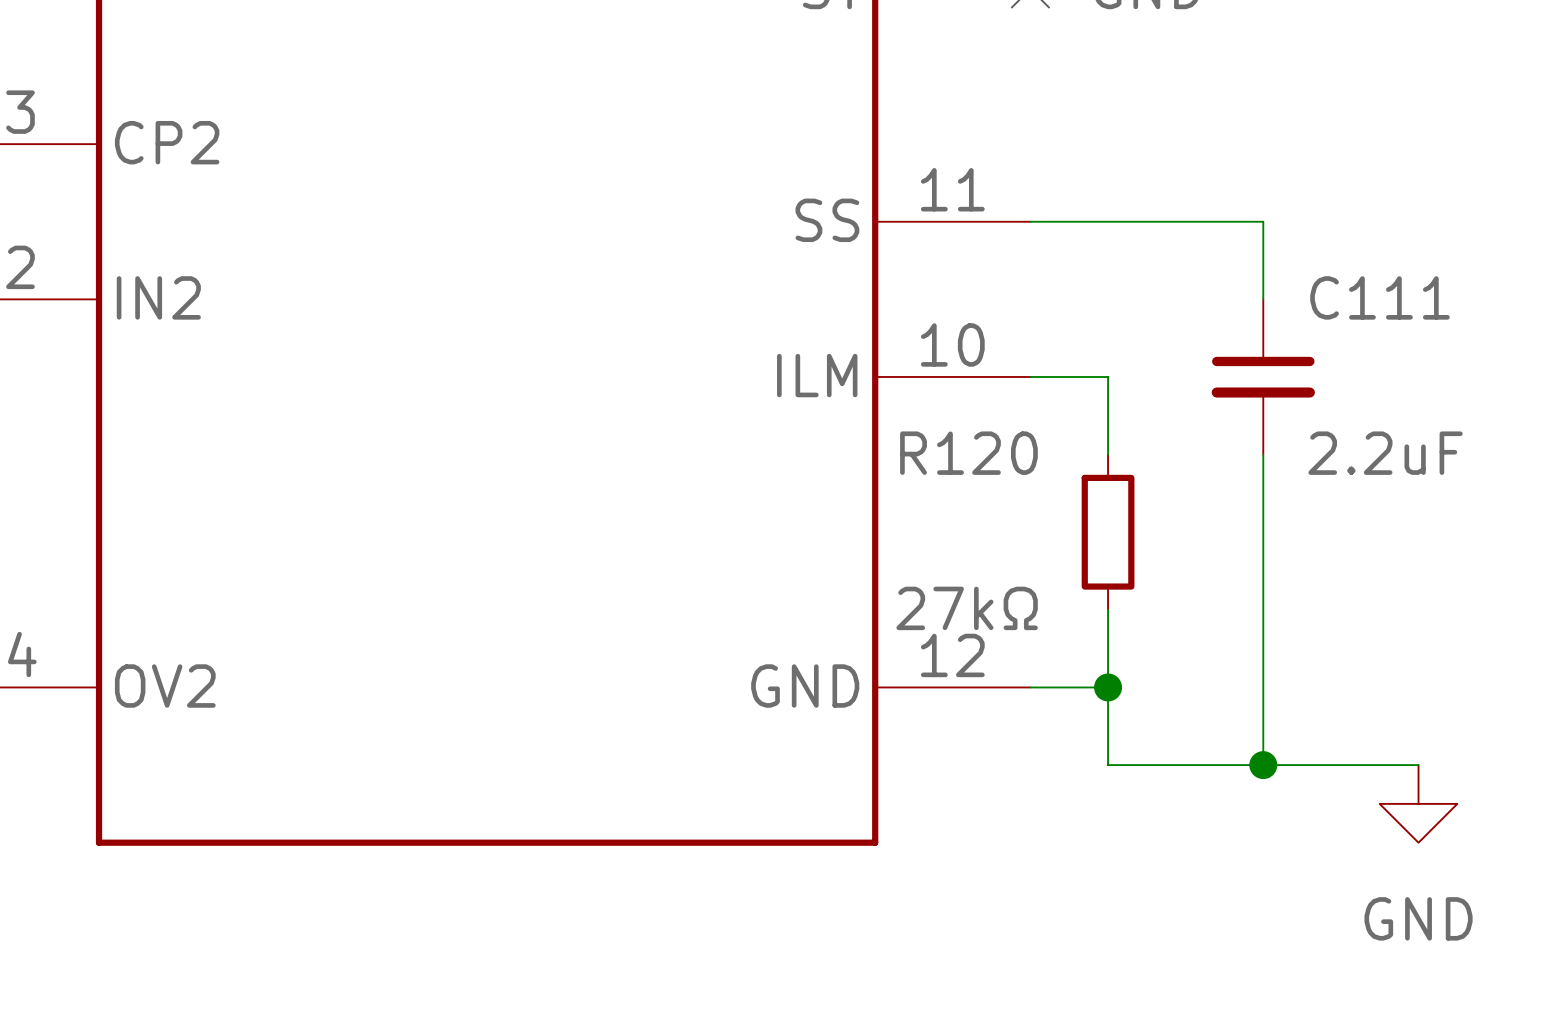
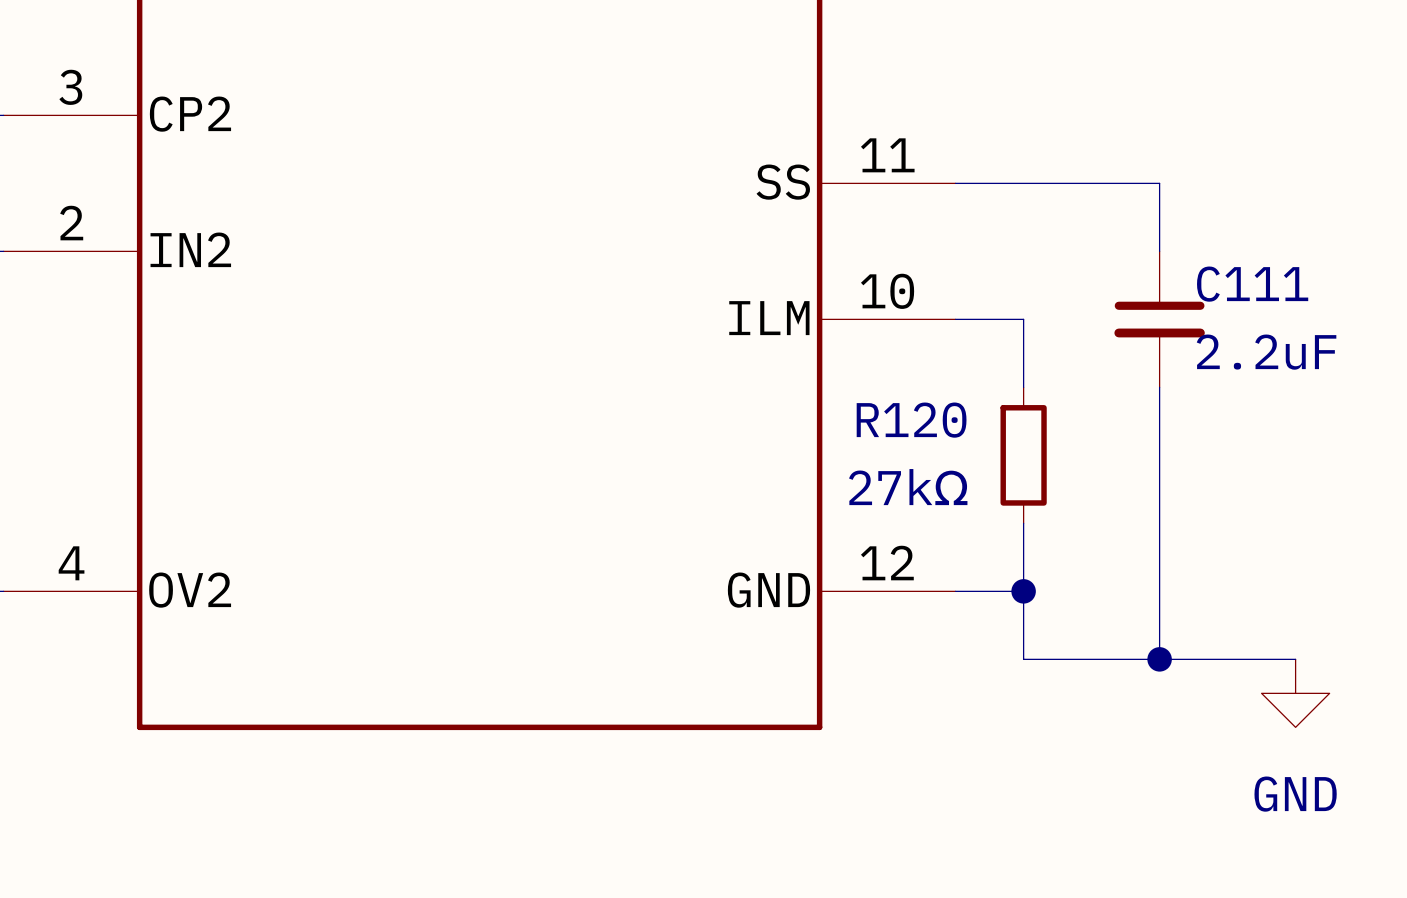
C111 name position: C111 (1380, 297) -> C111 (1252, 284)
R120 name position: R120 (968, 453) -> R120 (911, 420)
C111 value position: 2.2uF (1385, 453) -> 2.2uF (1266, 352)
R120 value position: 27kΩ (967, 608) -> 27kΩ (908, 487)

